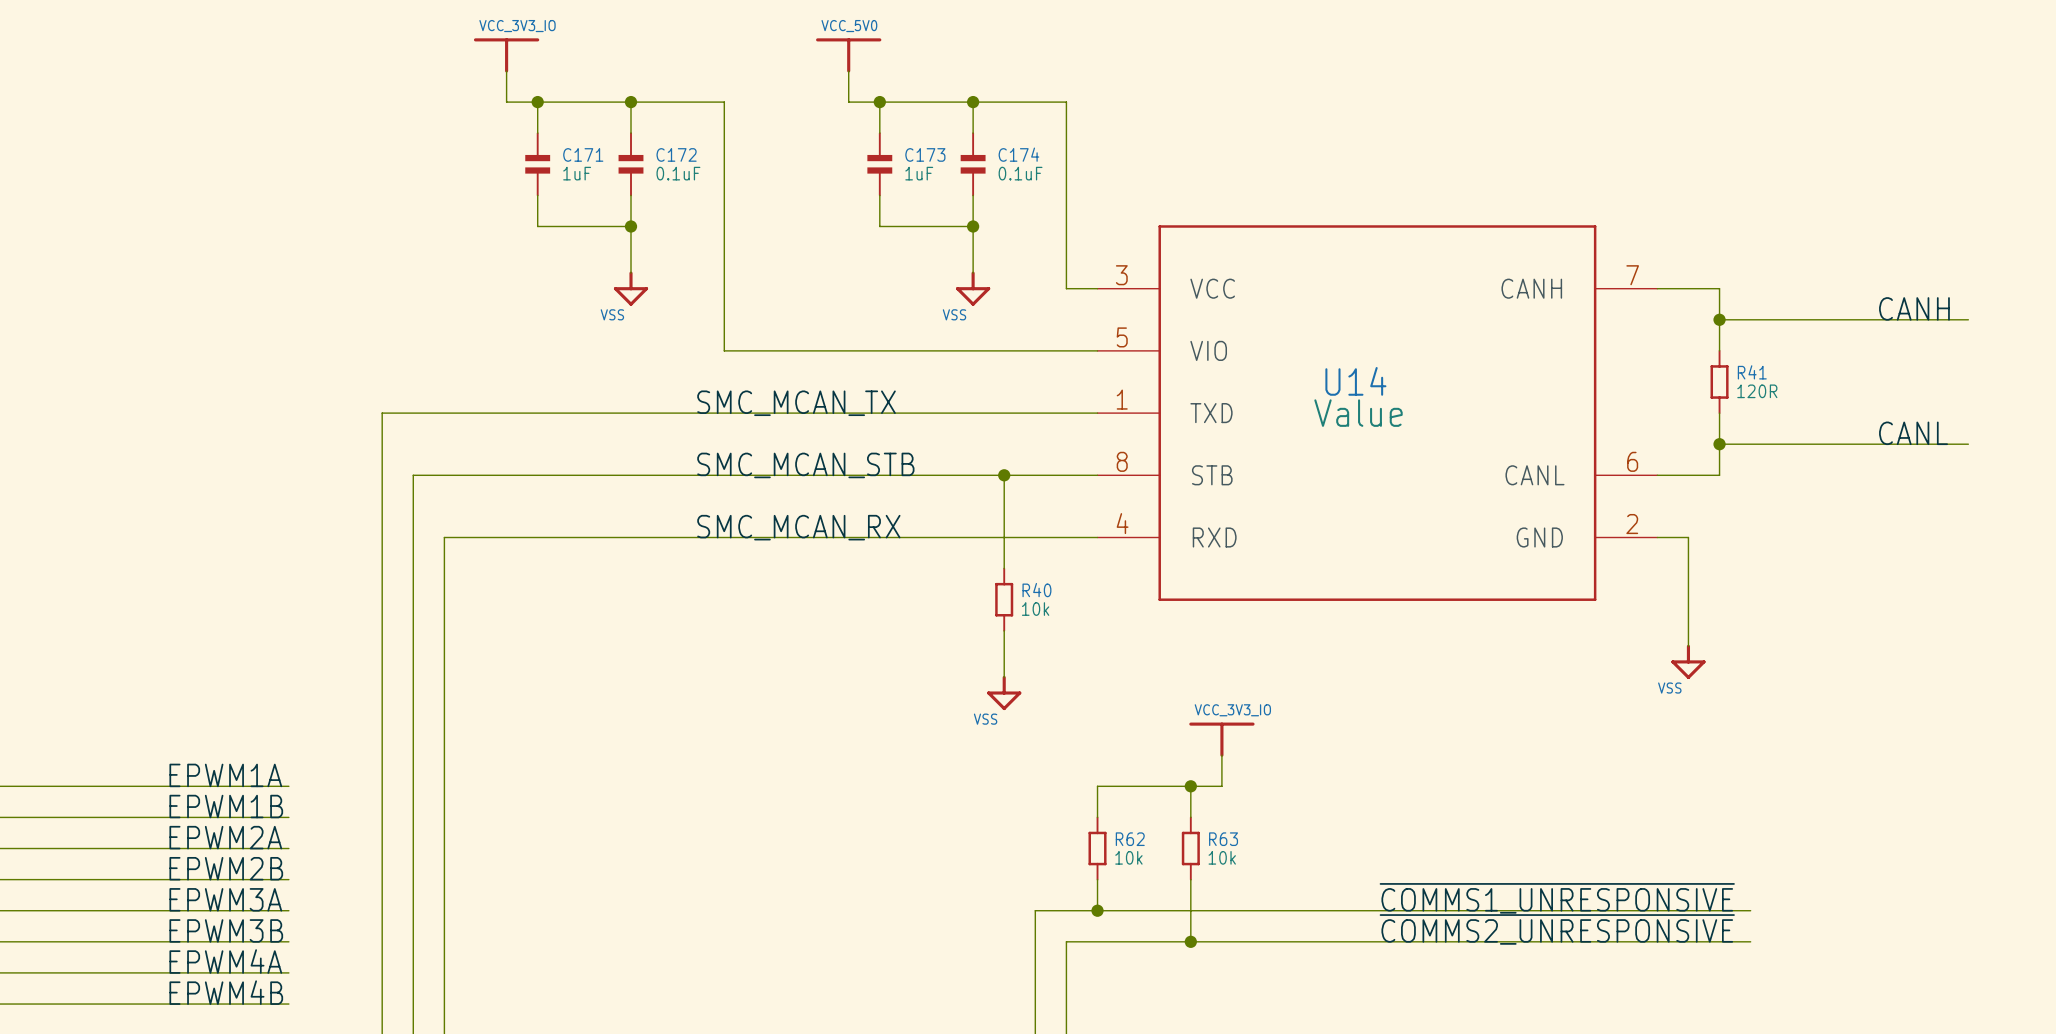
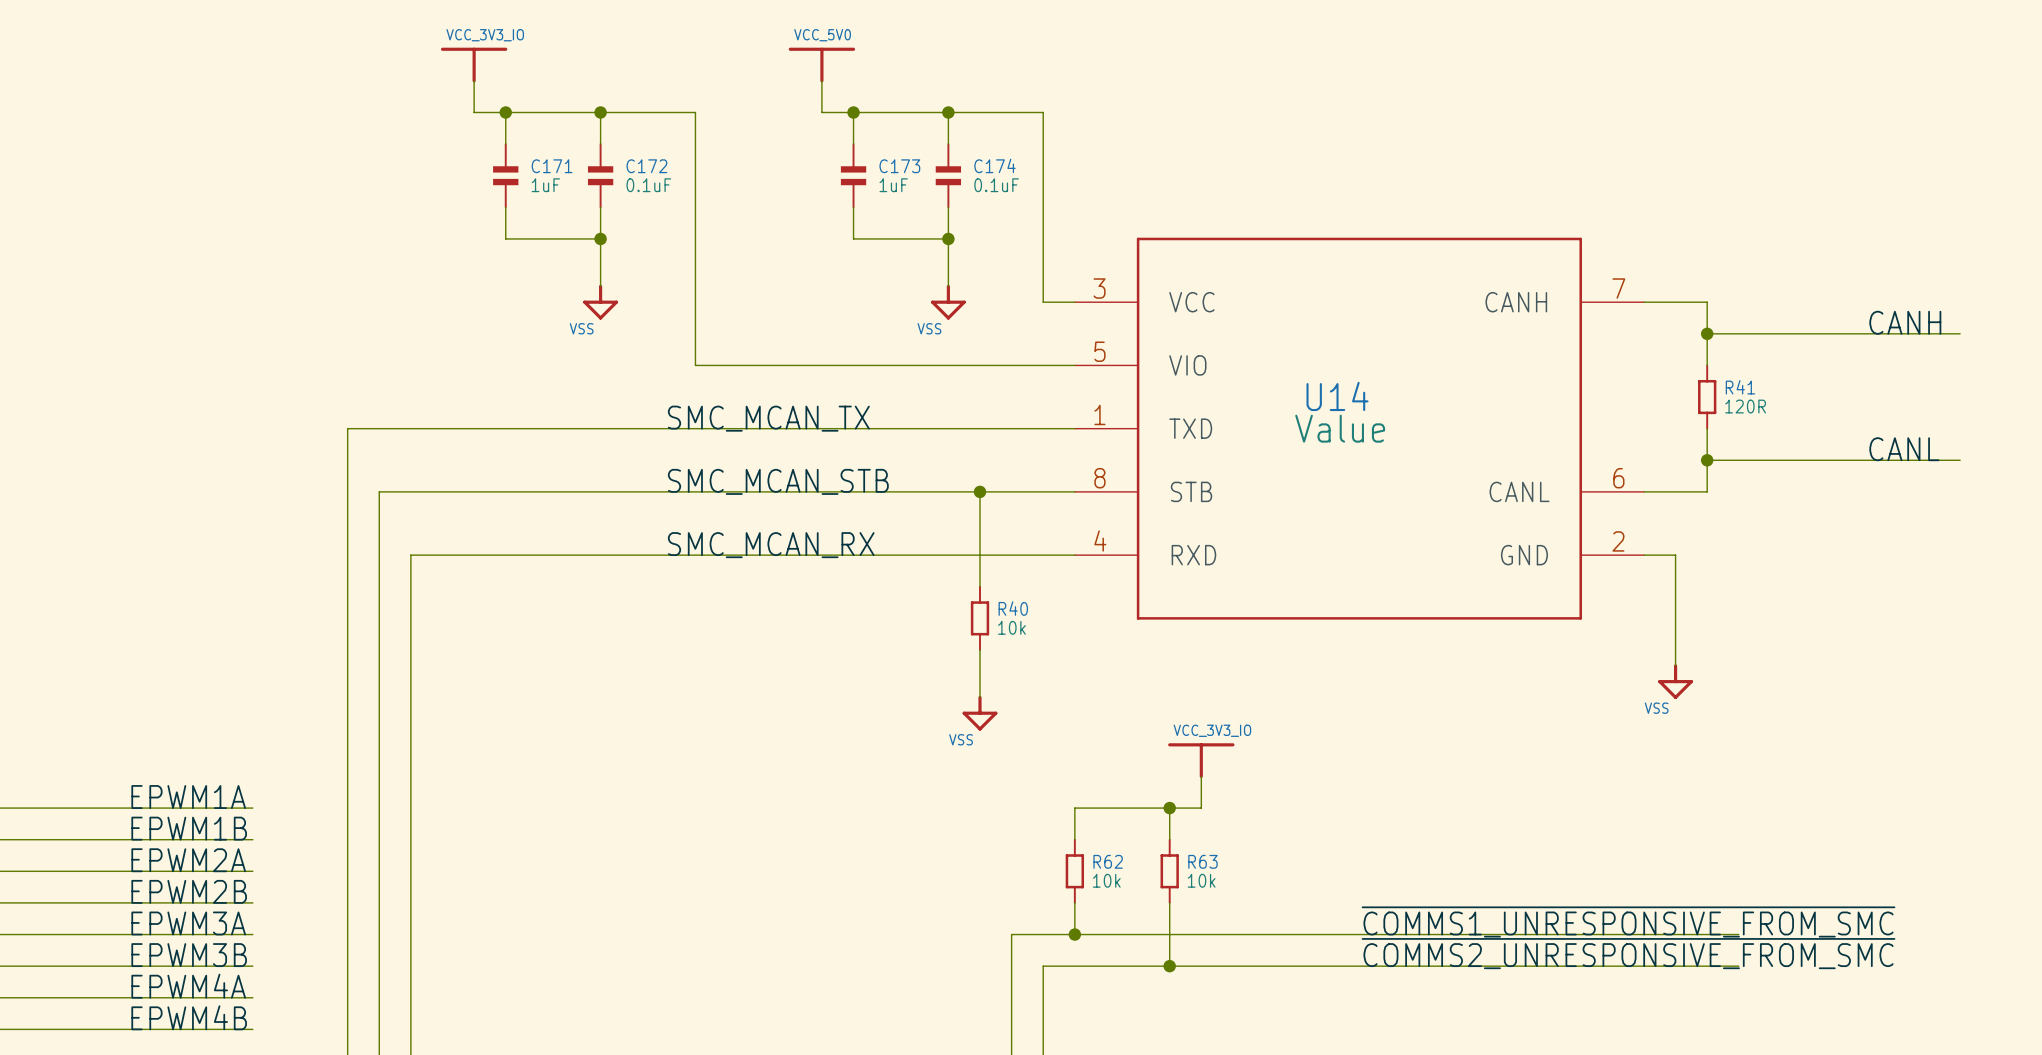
label: ~{COMMS1_UNRESPONSIVE} (1557, 898) -> ~{COMMS1_UNRESPONSIVE_FROM_SMC} (1628, 921)
label: ~{COMMS2_UNRESPONSIVE} (1557, 929) -> ~{COMMS2_UNRESPONSIVE_FROM_SMC} (1628, 953)

